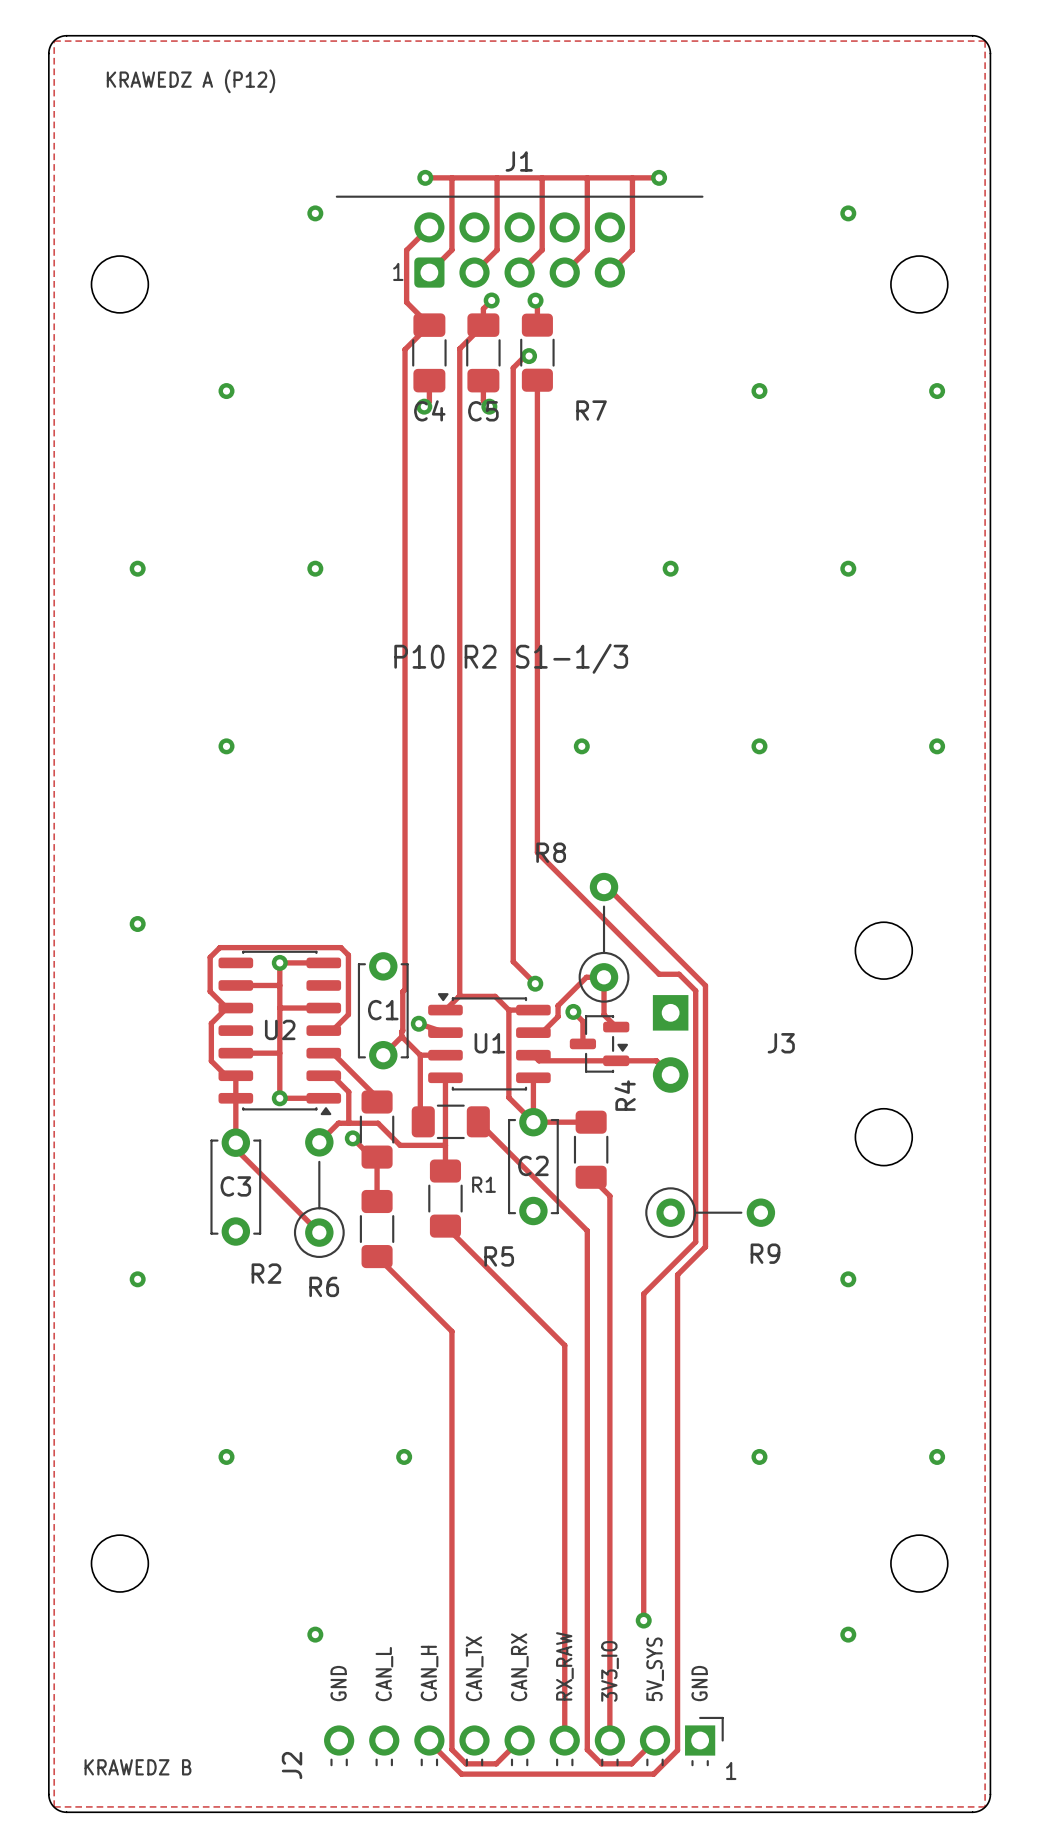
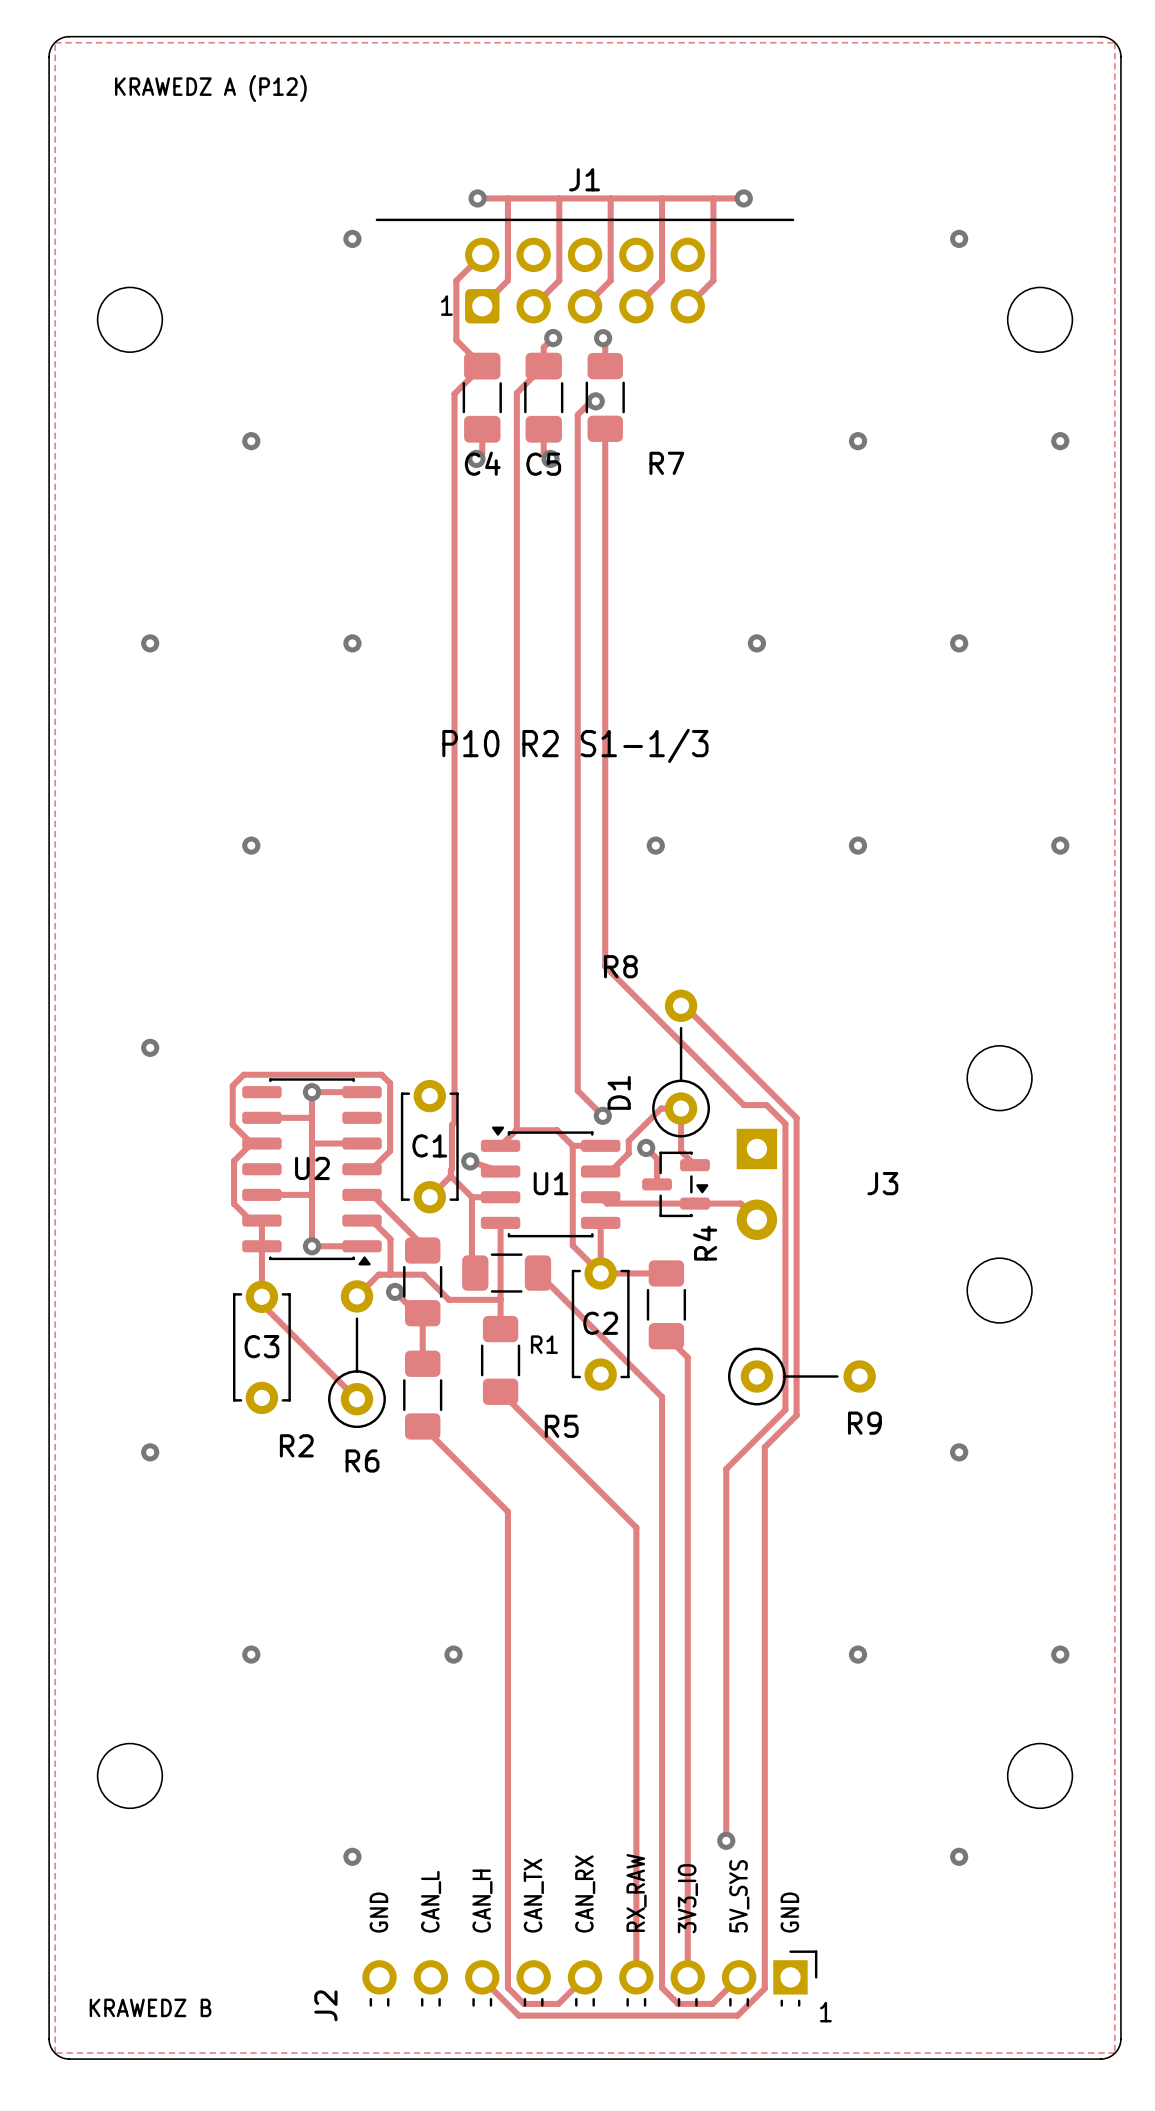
D1 name: none -> D1 (619, 1092)

